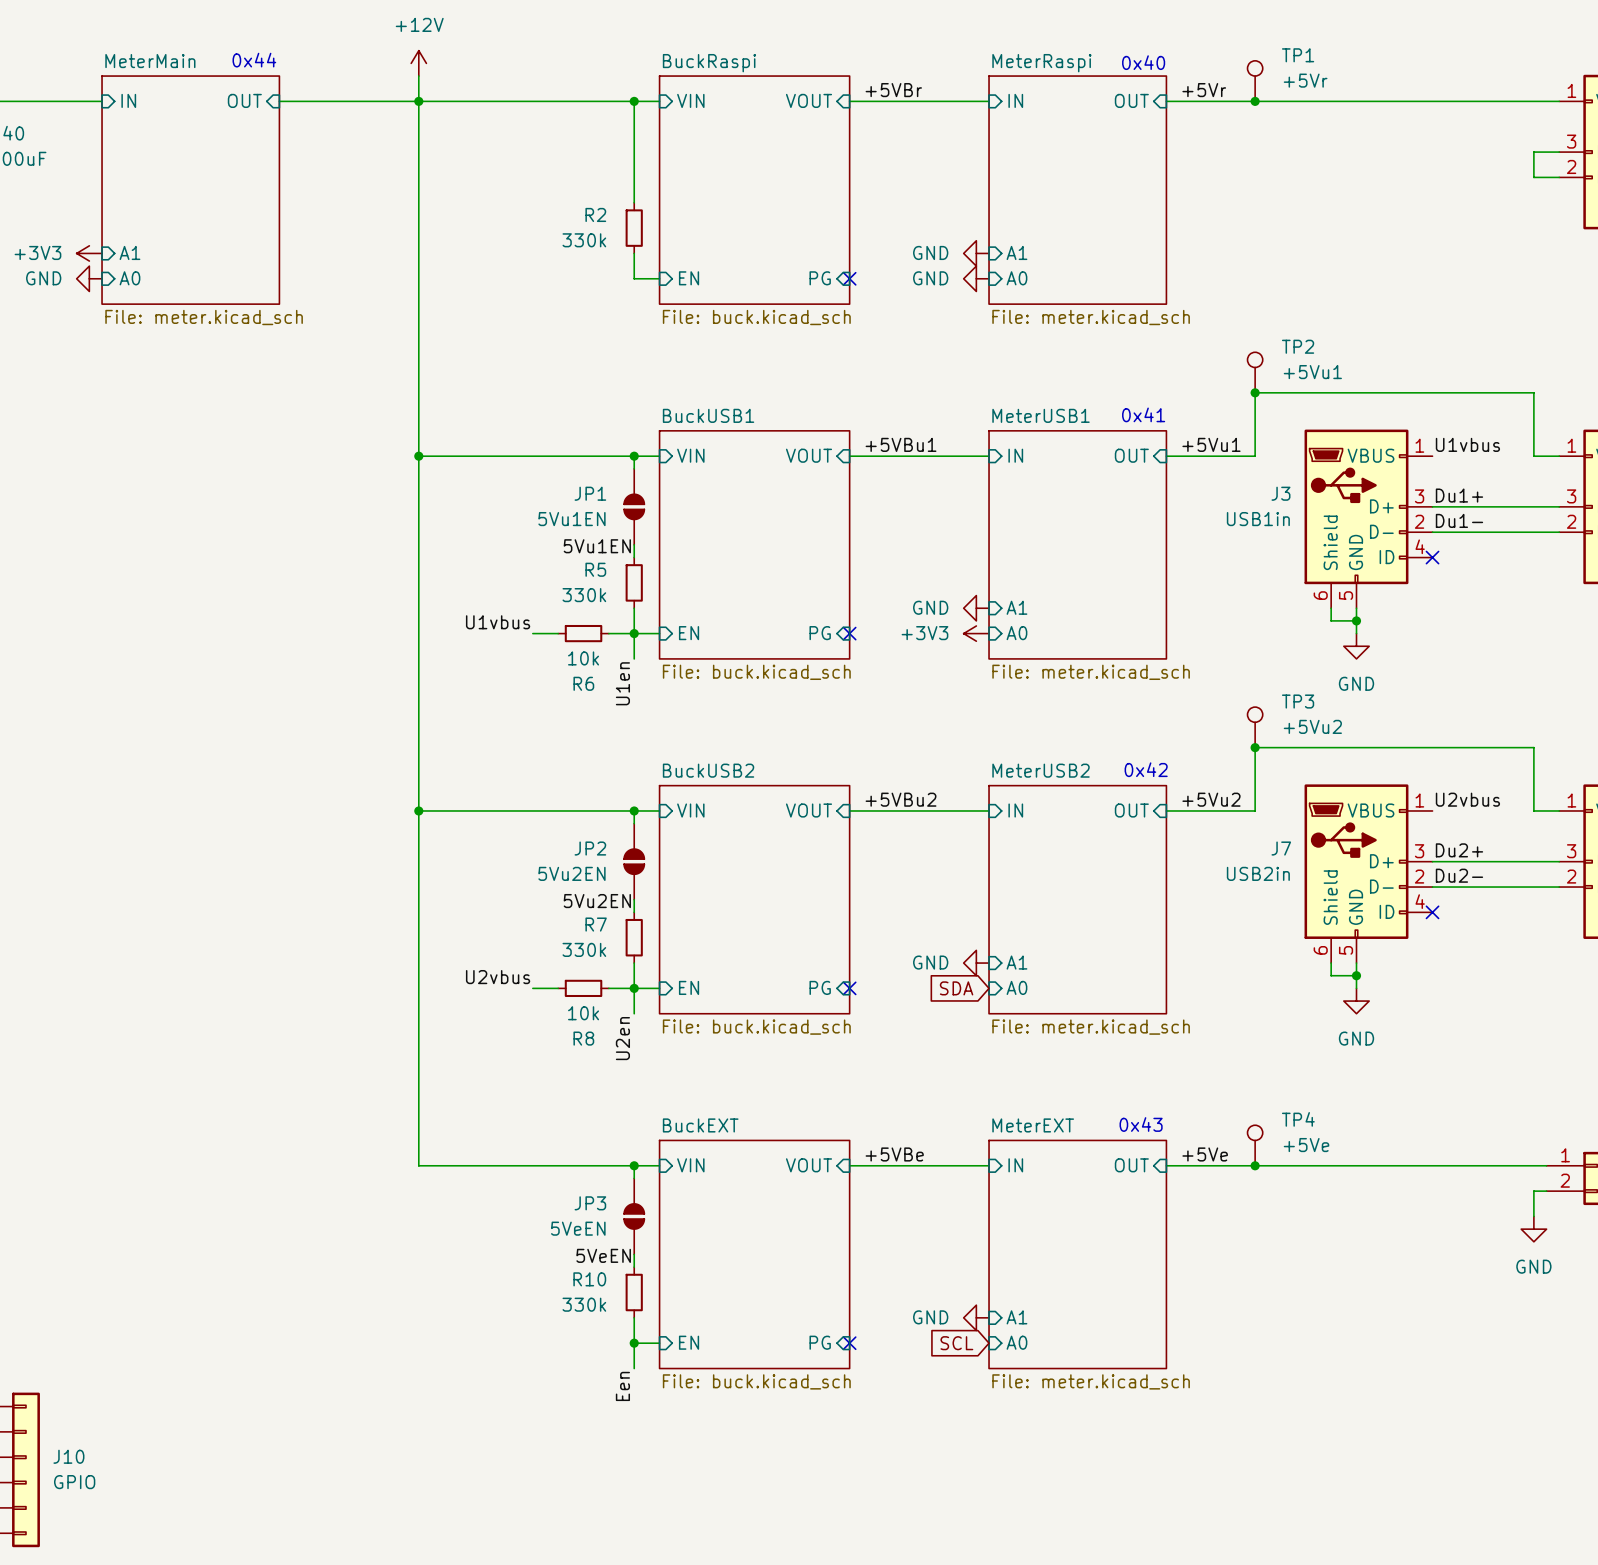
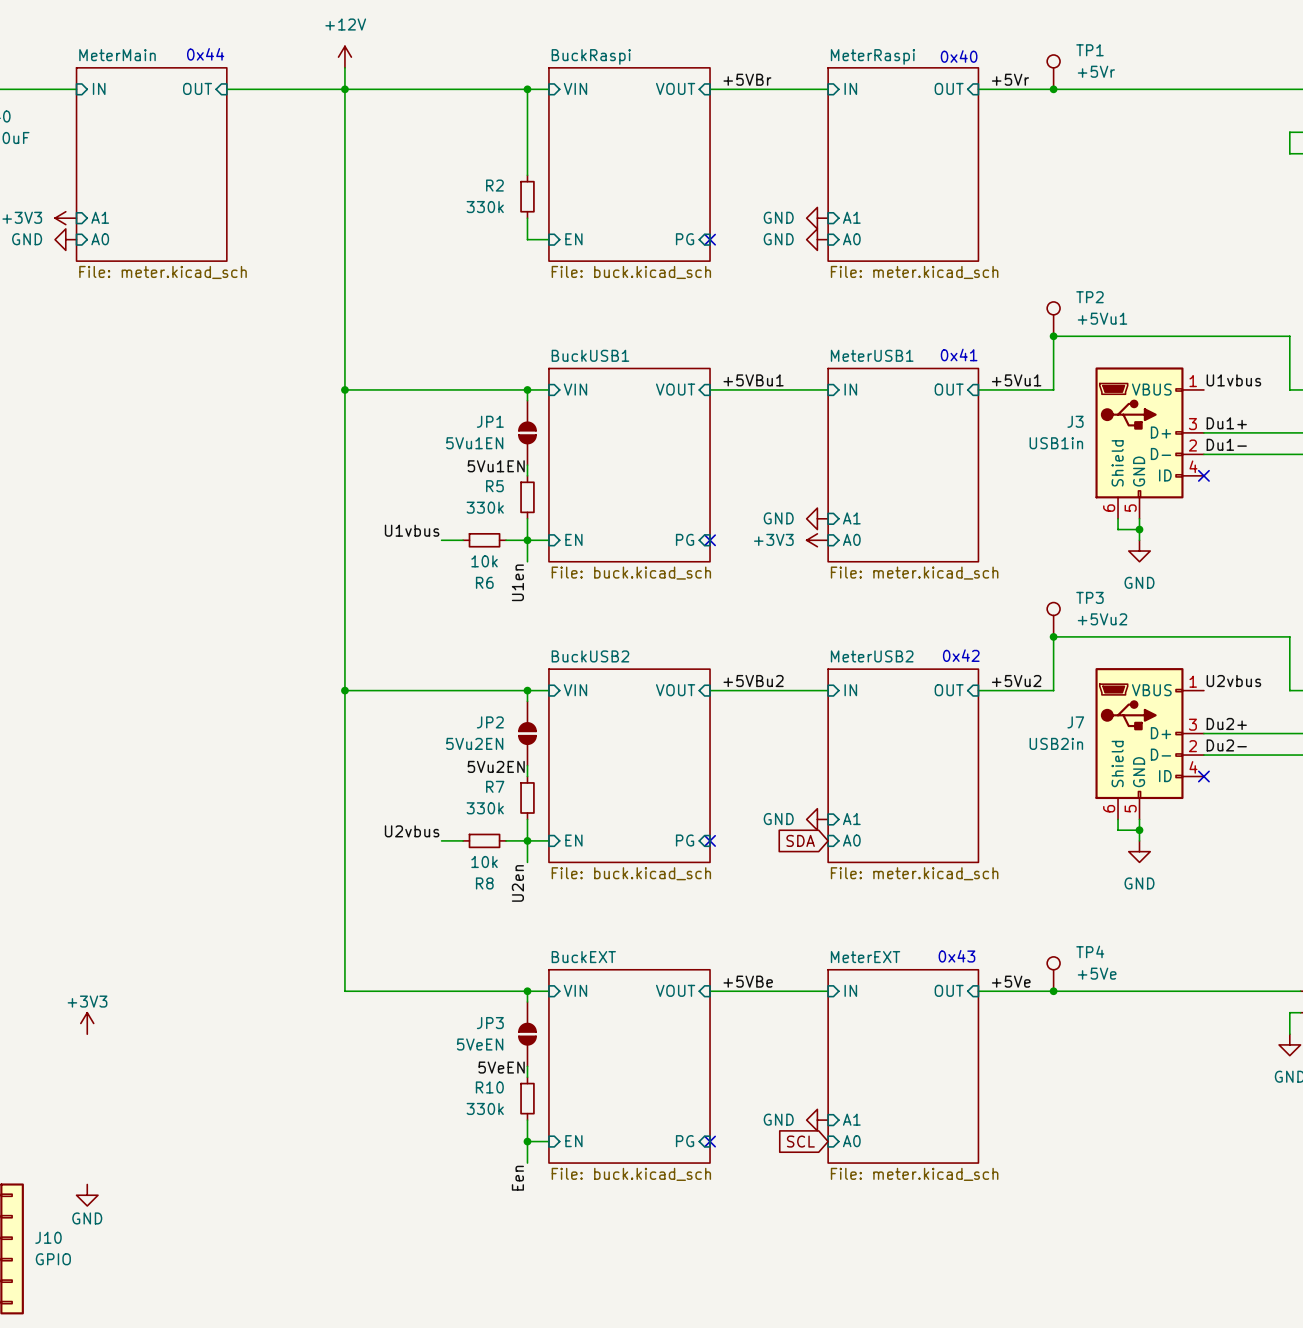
power symbol: none -> +3V3 (87, 1023)
power symbol: none -> GND (87, 1195)

